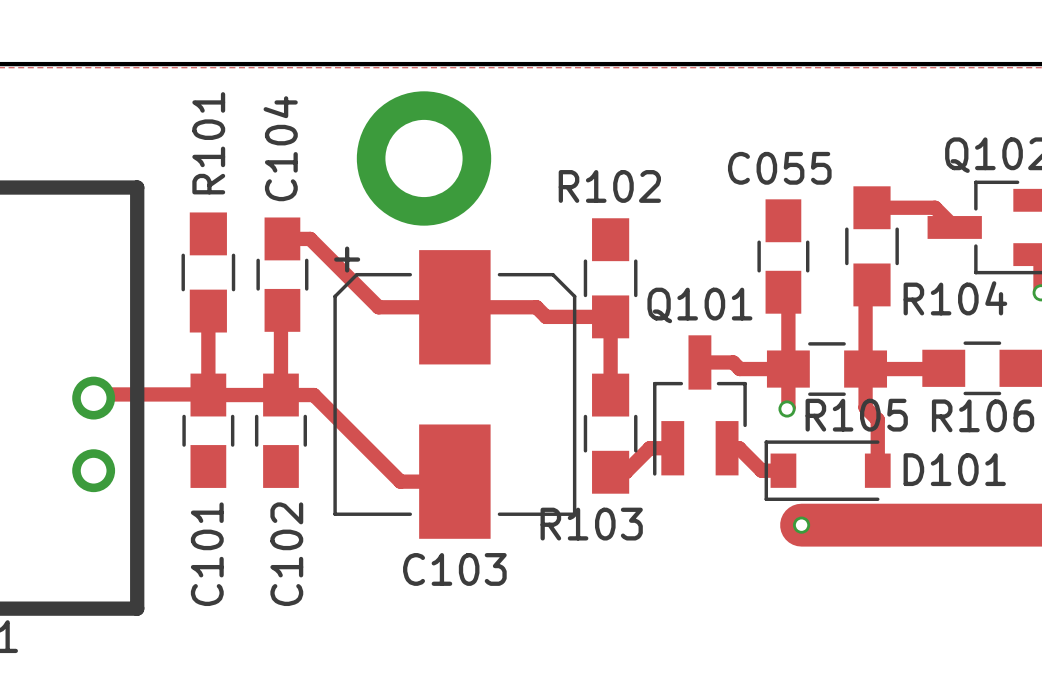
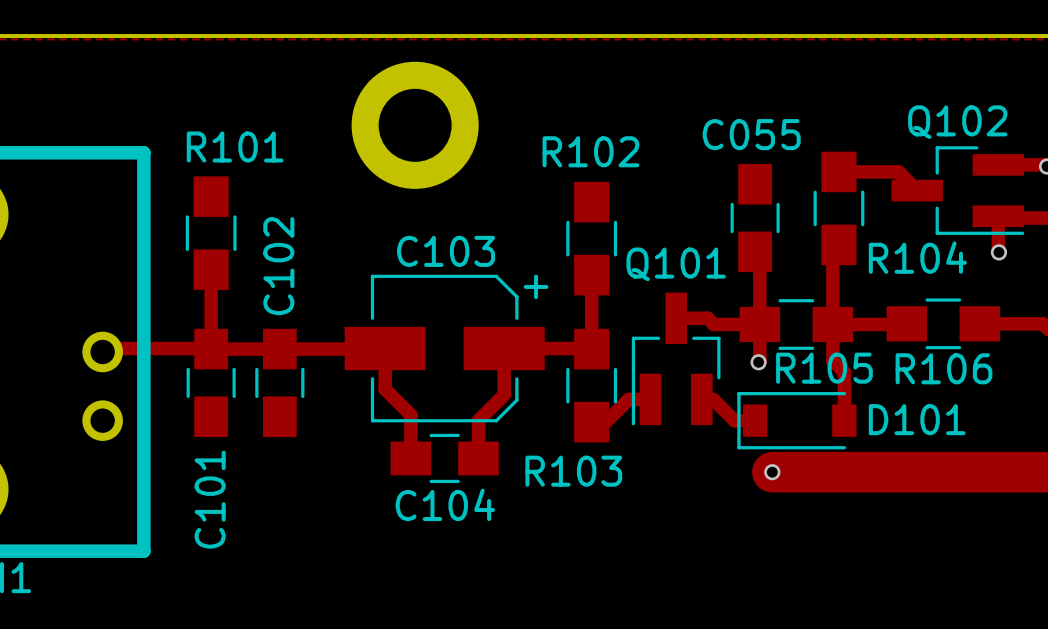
R101 name rotation: 0° (208, 143) -> 90° clockwise (235, 146)
C104 name position: C104 (280, 148) -> C104 (445, 504)
track: (282, 238) (310, 238) (378, 307) (536, 307) (546, 316) (610, 316) -> none
C103 footprint: [333, 250, 577, 539] -> [344, 274, 545, 423]
C104 rotation: 0° (282, 274) -> 90° clockwise (444, 458)
C104 position: (282, 274) -> (444, 458)
track: (282, 310) (280, 395) -> none
track: none -> (591, 348) (504, 348) (504, 394) (478, 420) (478, 458)
track: (313, 395) (400, 481) (454, 481) -> (310, 349) (385, 348) (385, 389) (410, 415) (410, 458)
C102 name position: C102 (286, 554) -> C102 (278, 266)
C103 name position: C103 (454, 569) -> C103 (446, 251)

